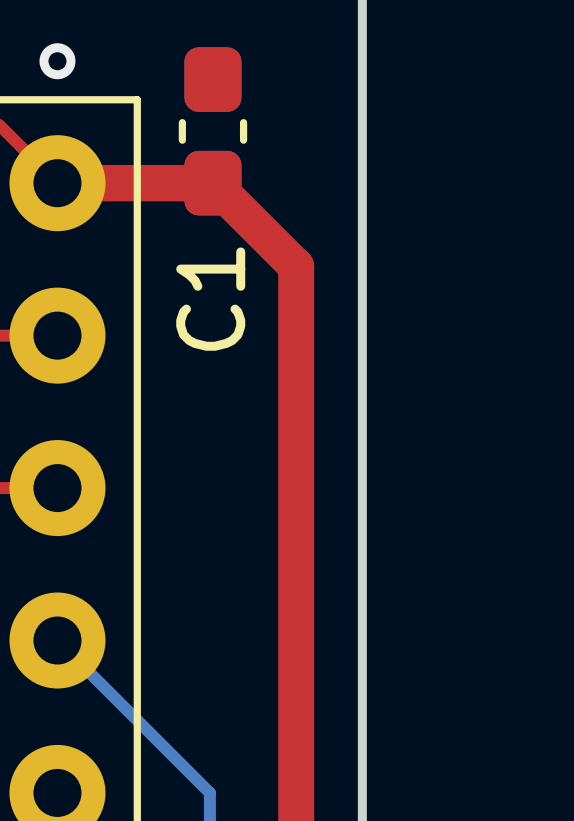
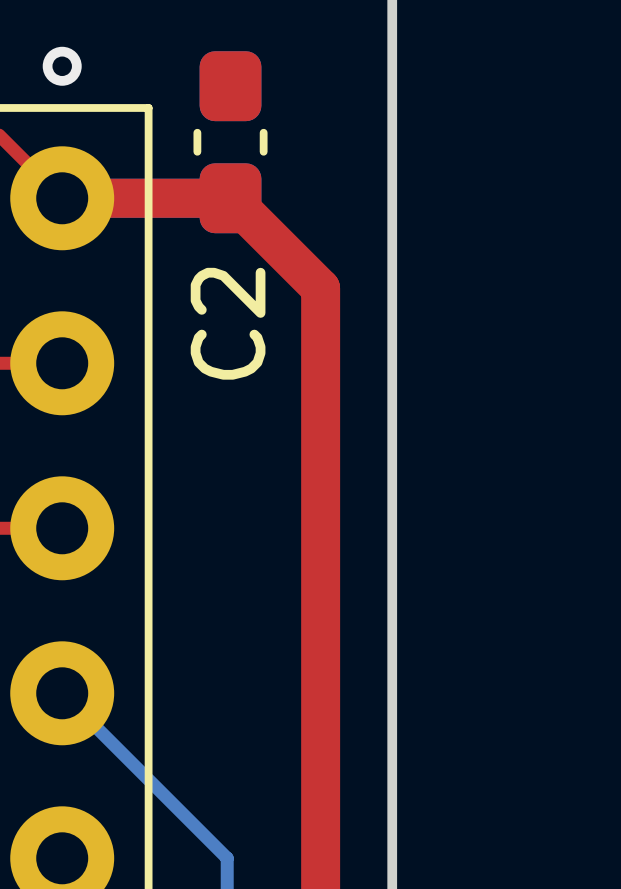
C1 name: C1 (210, 299) -> C2 (228, 323)

